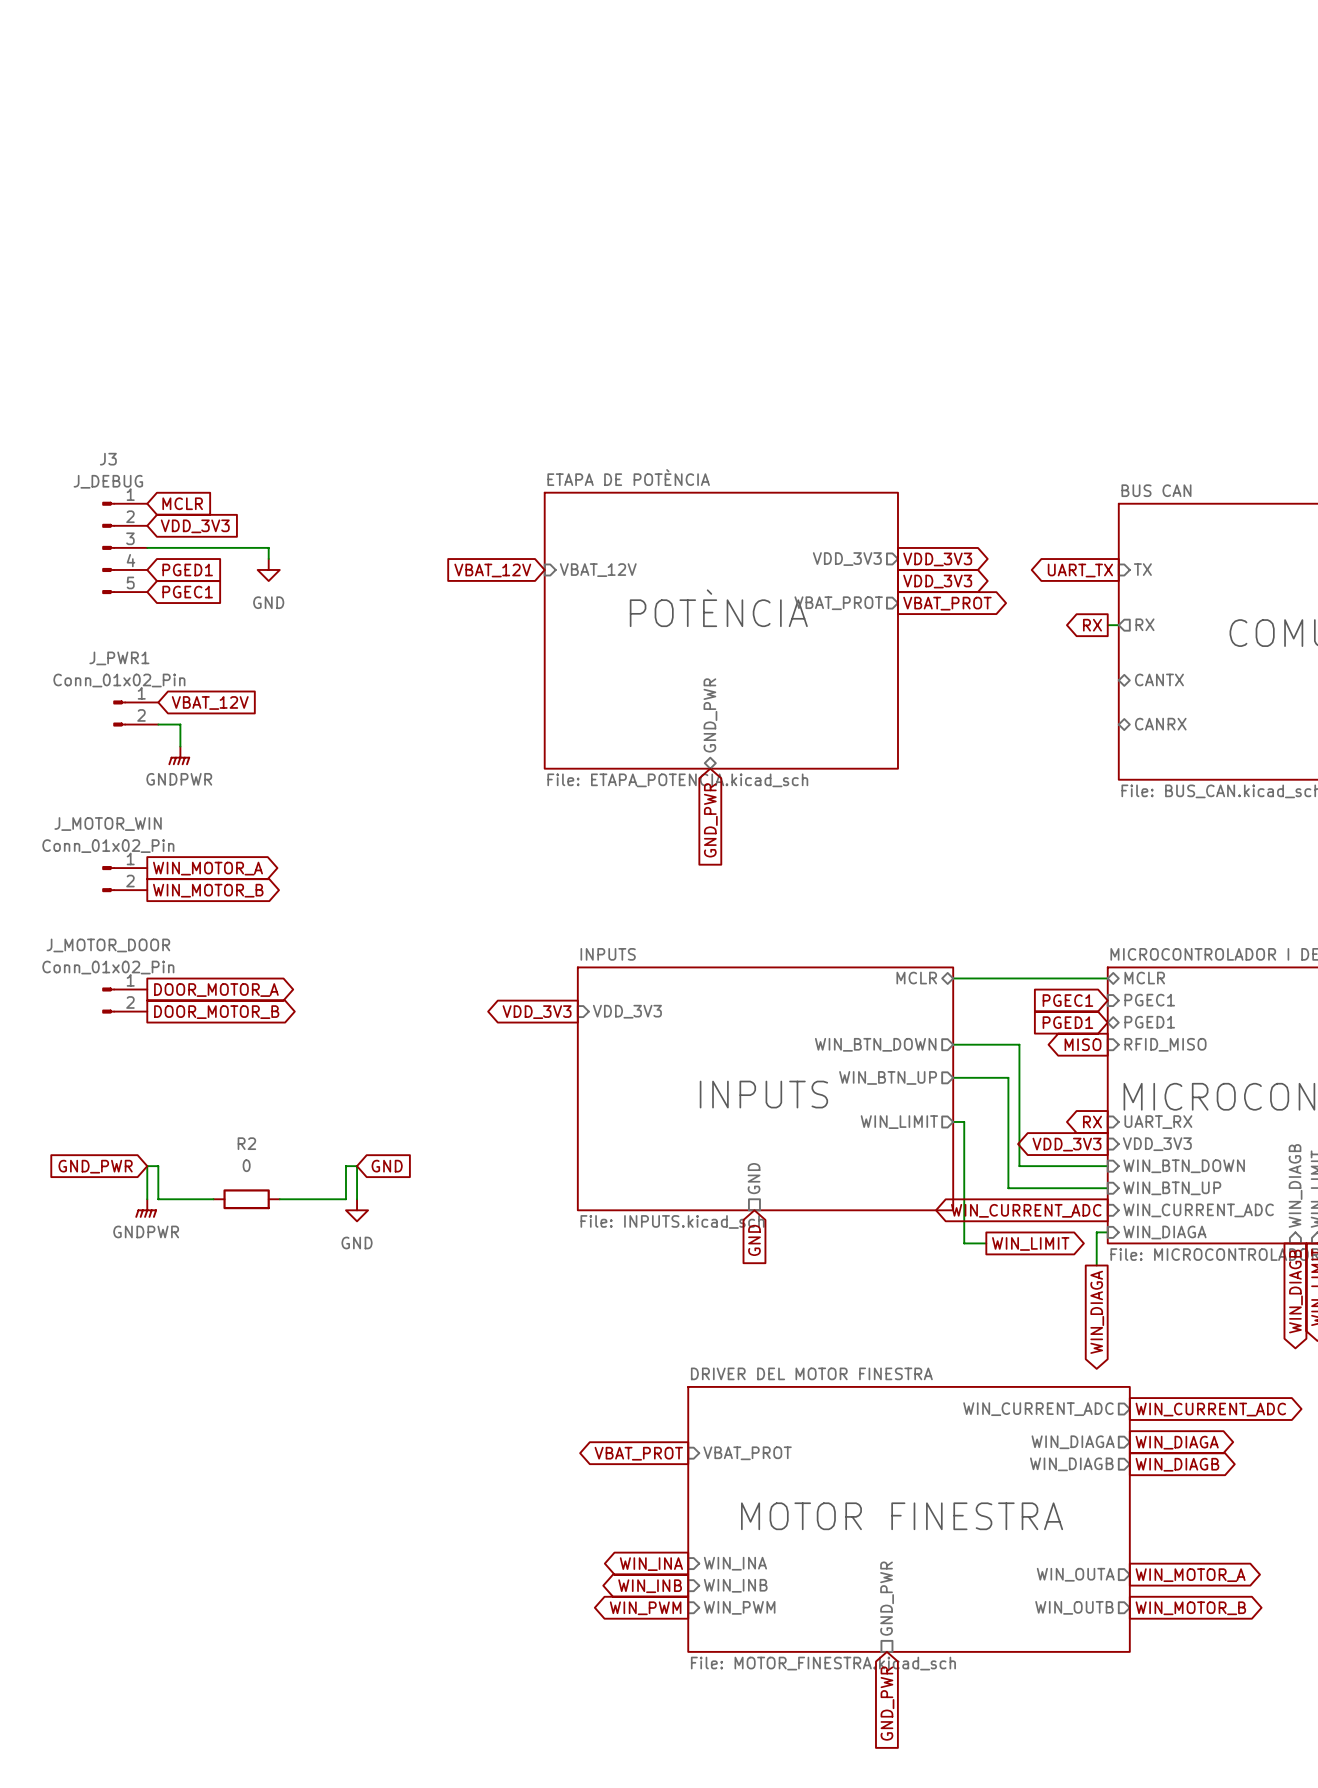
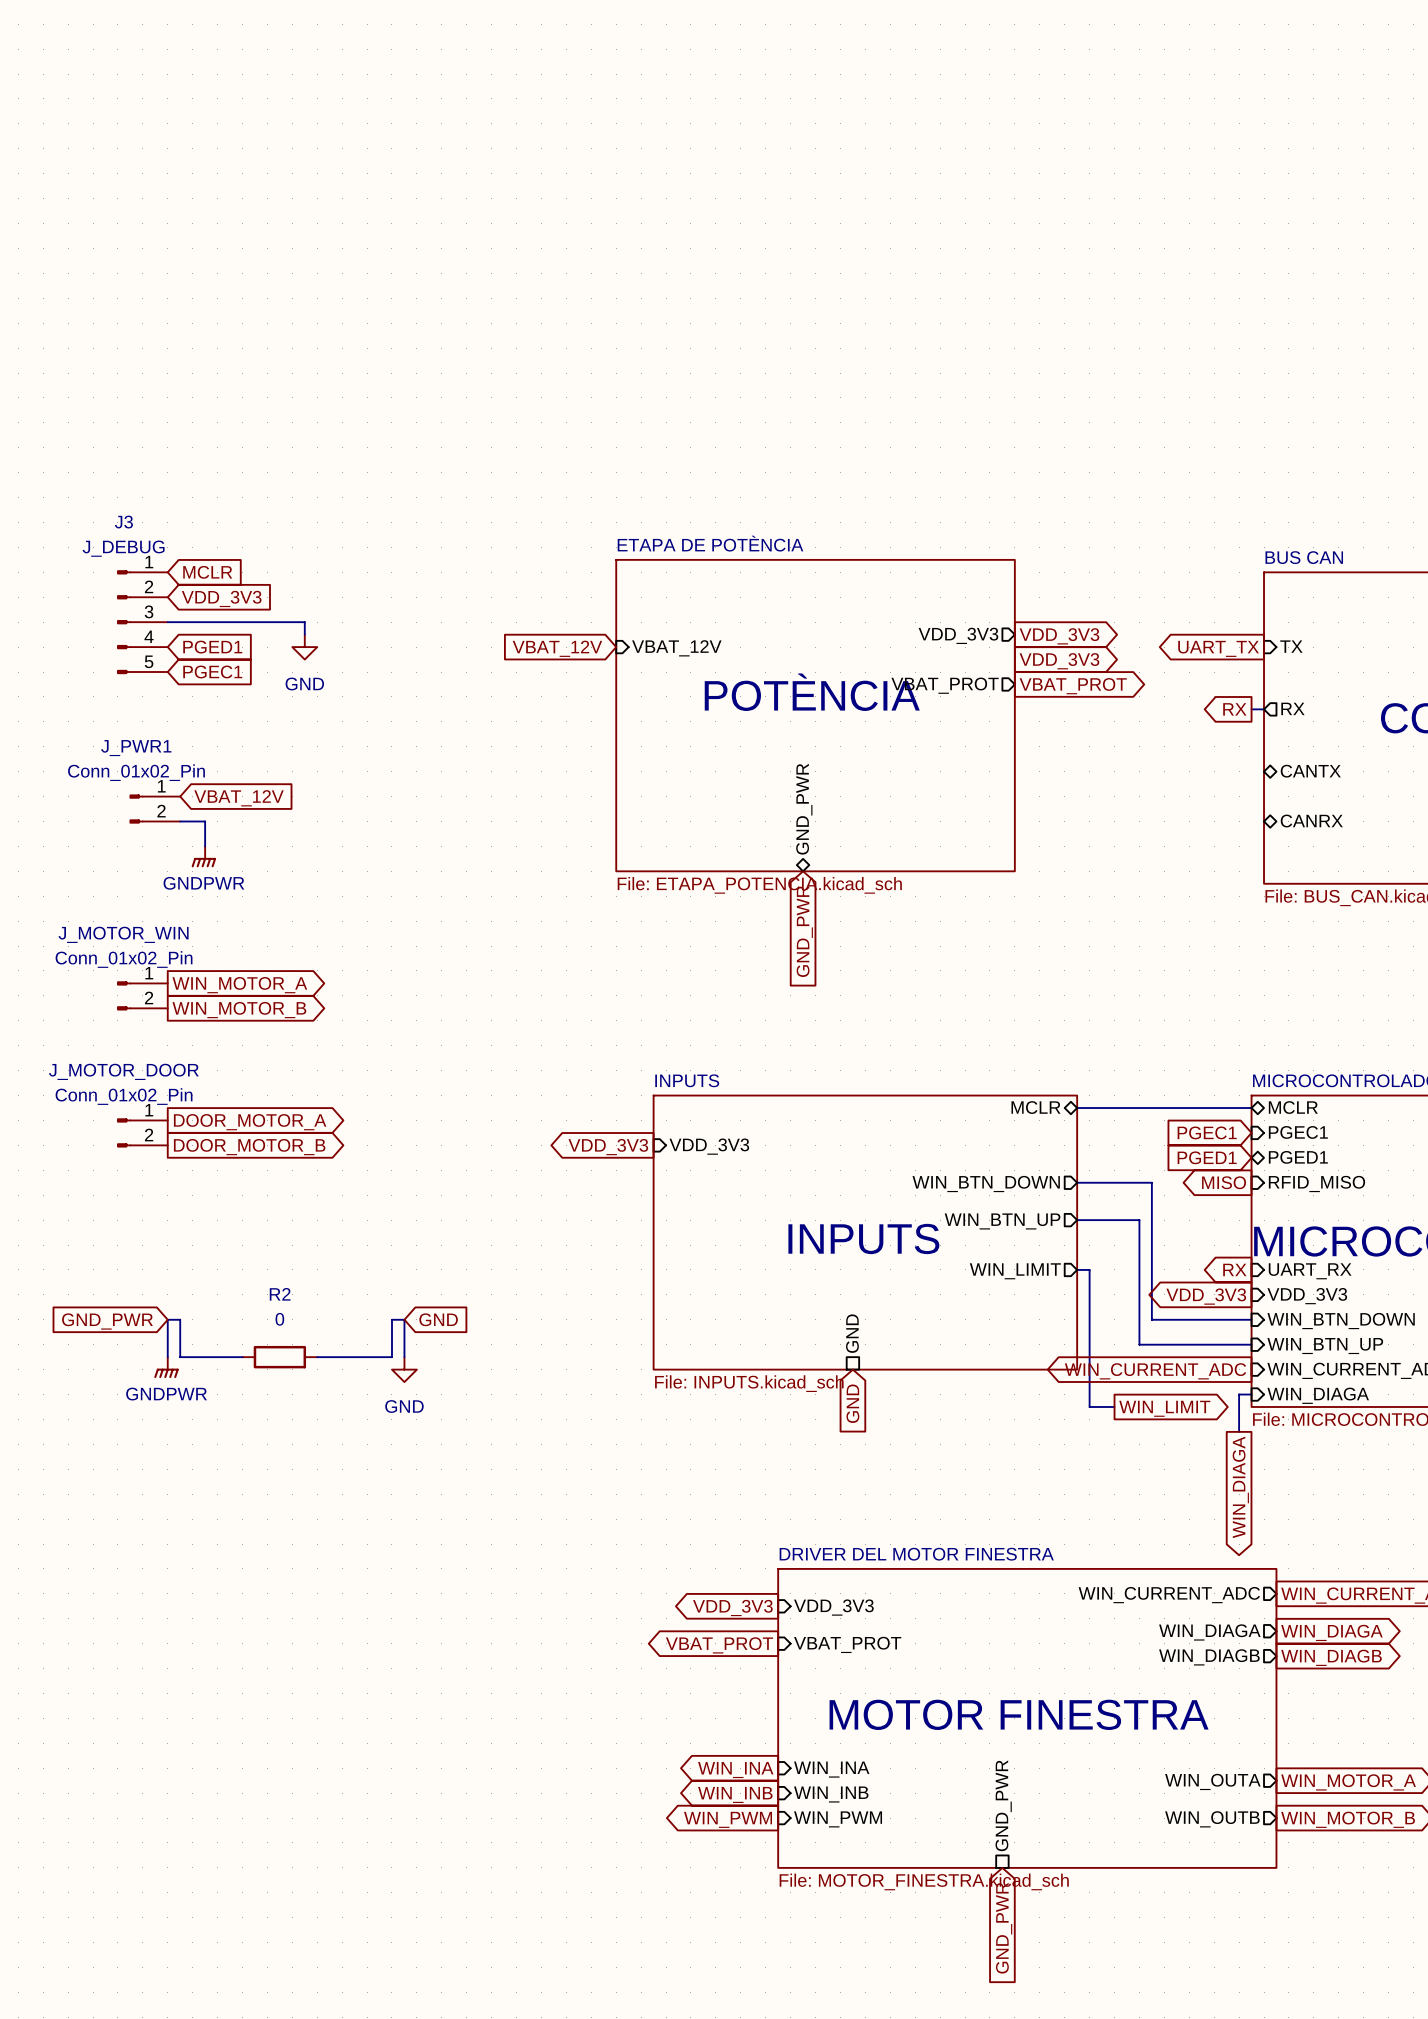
global label: none -> VDD_3V3 (732, 1608)
sheet pin: none -> VDD_3V3 (833, 1607)

